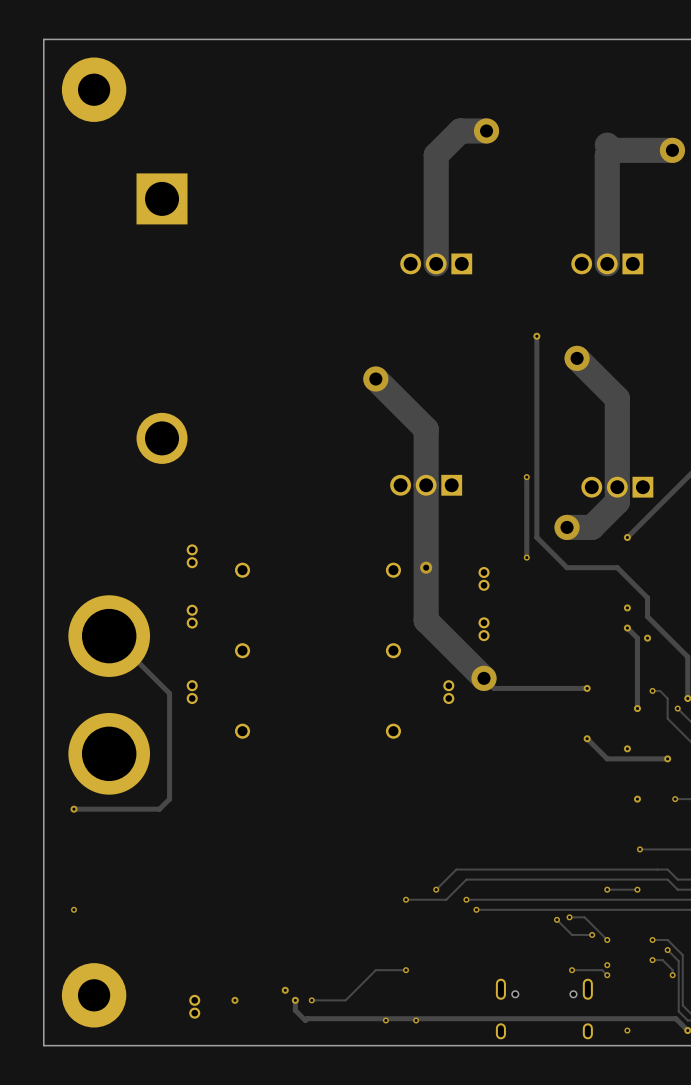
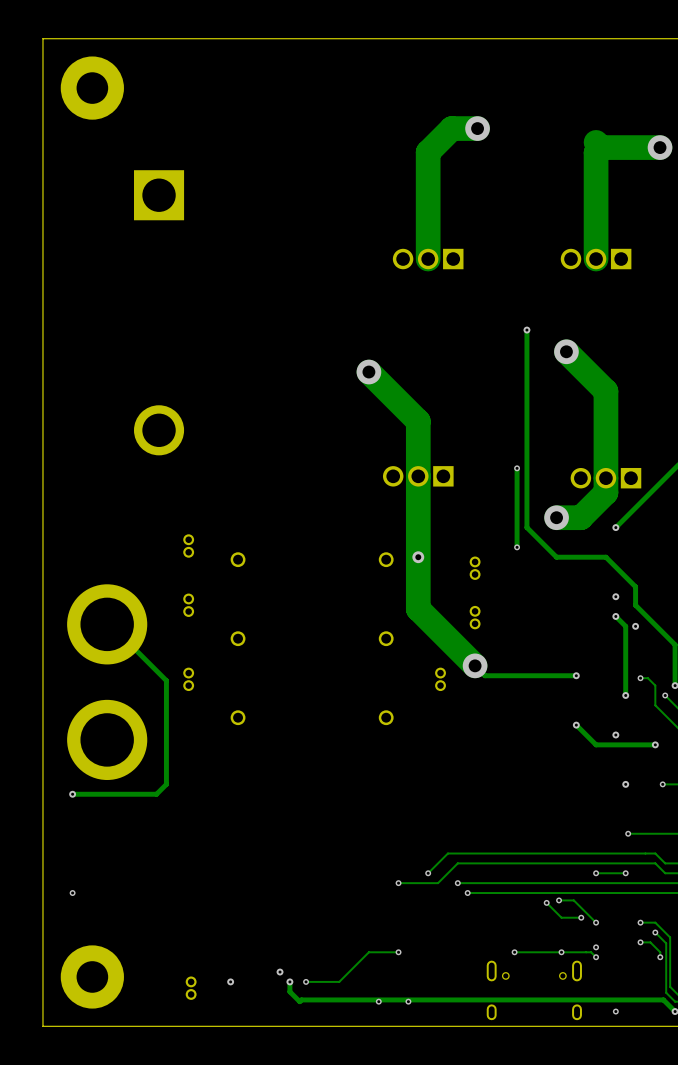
via: none -> (514, 952)
track: none -> (561, 952) (514, 952)

